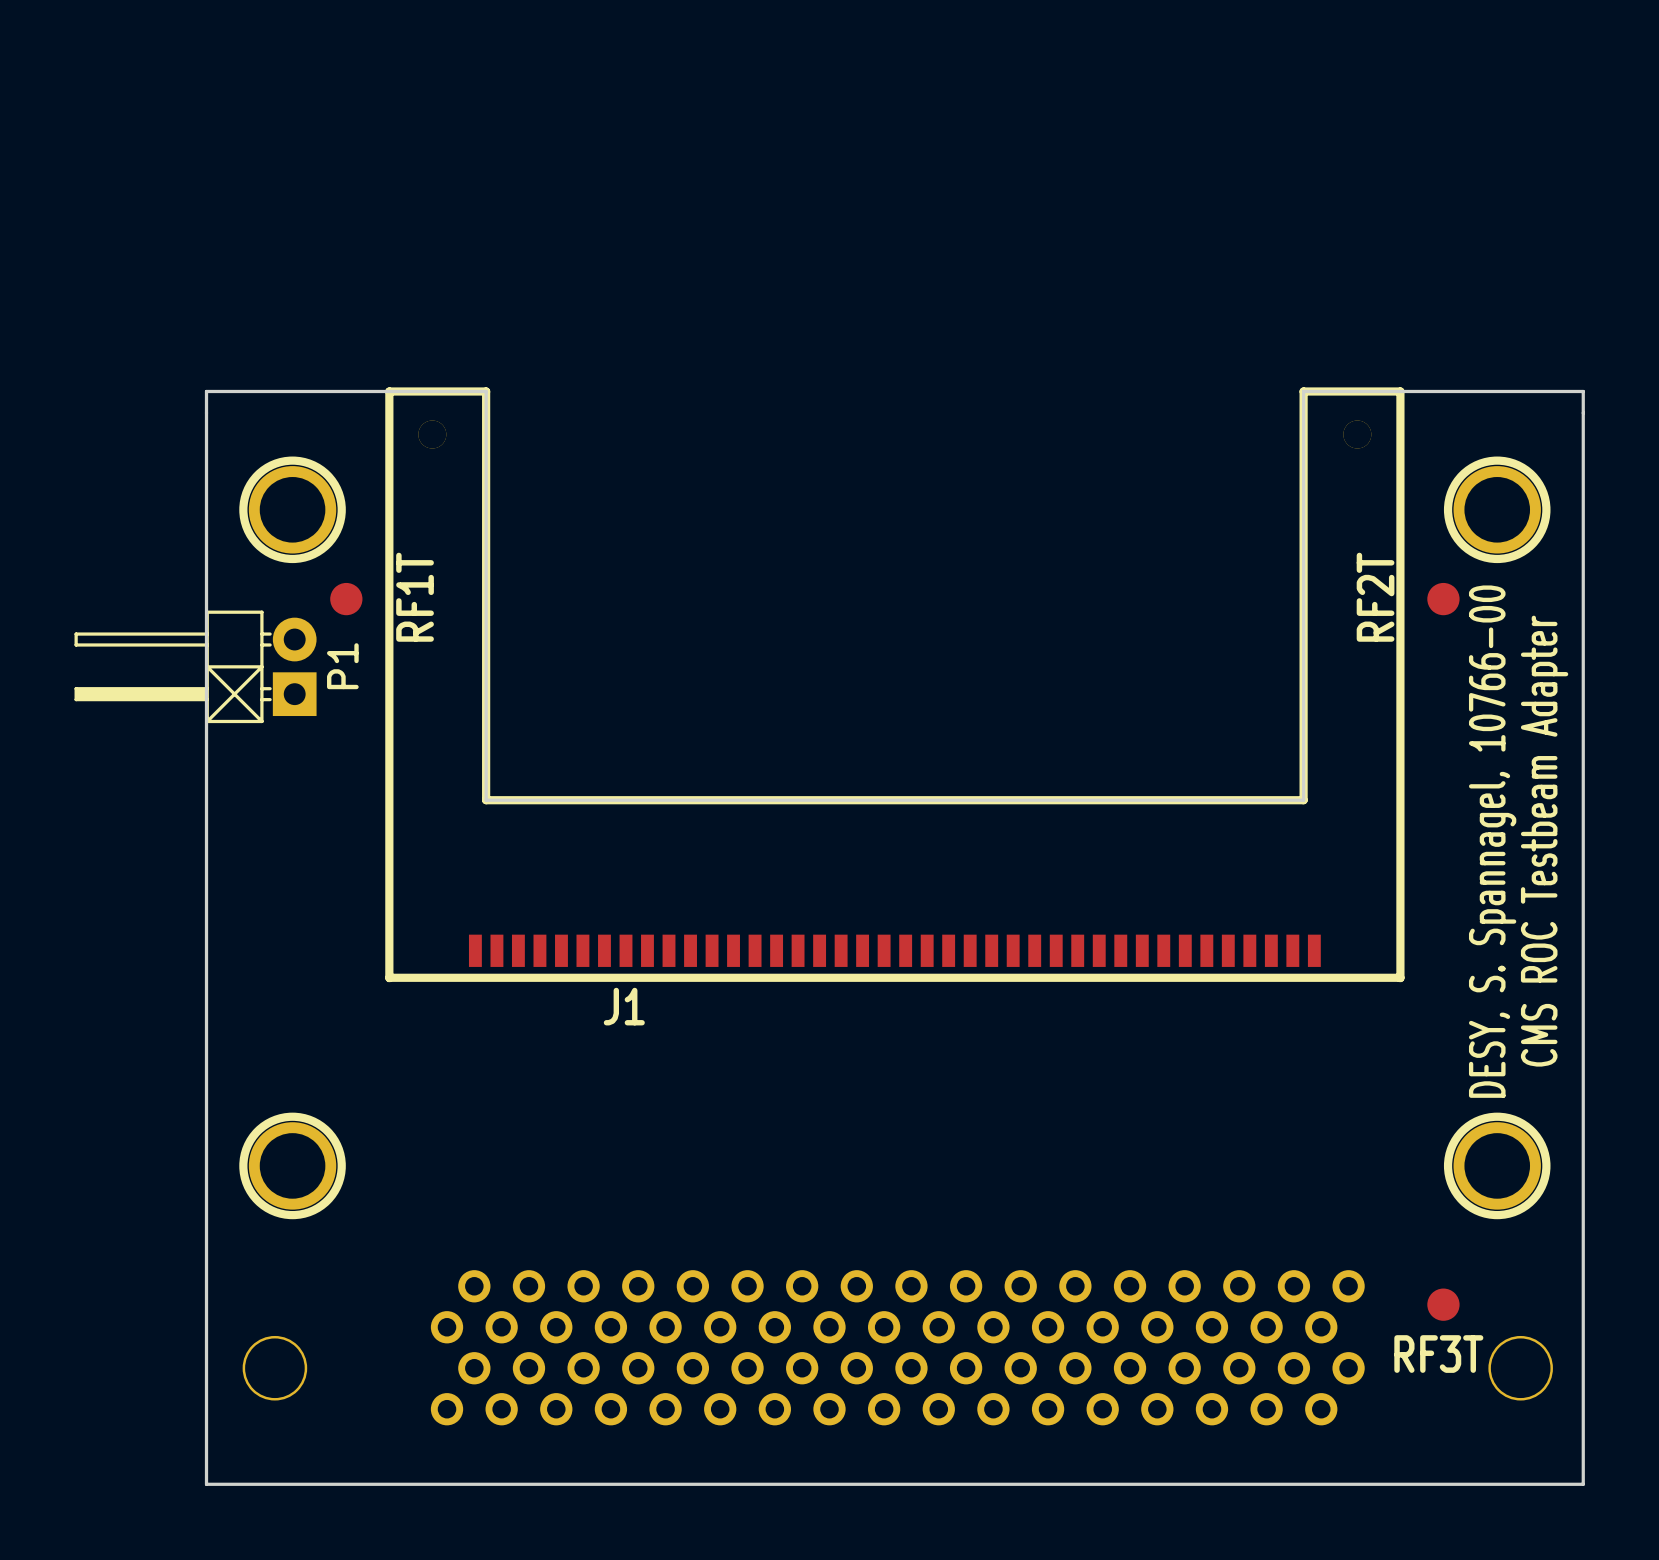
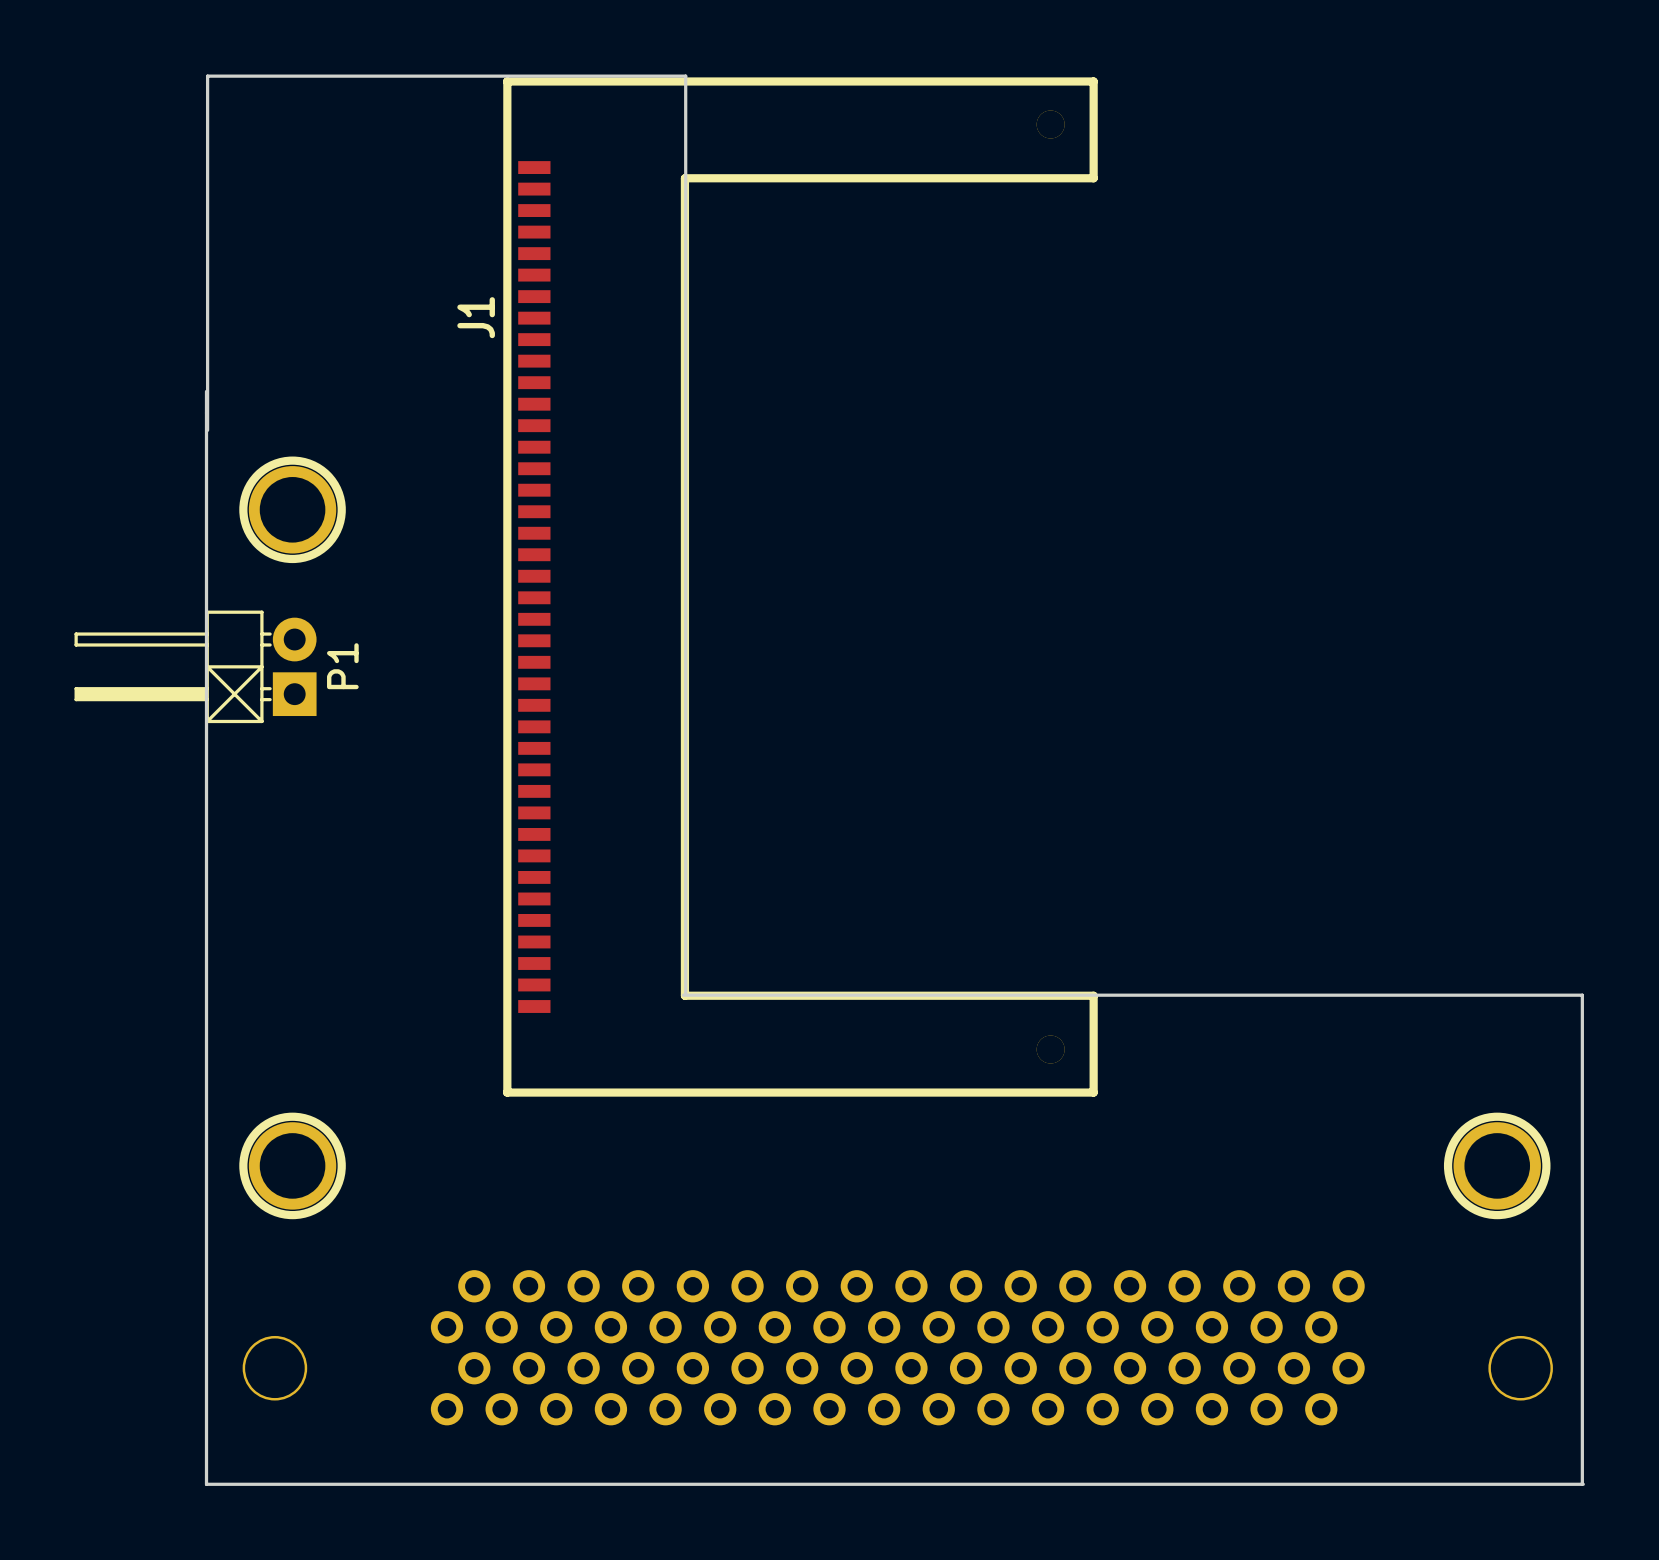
board edge: (206, 391) (486, 391) (486, 800) (1303, 800) (1303, 391) (1583, 391) (1583, 1484) -> none
board edge: none -> (207, 430) (207, 76) (685, 76) (685, 993)
part: (1497, 509) -> none
RF1T: (346, 599) -> none
RF2T: (1443, 599) -> none
J1 rotation: 0° (894, 684) -> 90° clockwise (800, 587)
text: DESY, S. Spannagel, 10766-00 (1492, 841) -> none
text: CMS ROC Testbeam Adapter (1544, 841) -> none
board edge: none -> (683, 995) (1582, 995) (1582, 1483)
RF3T: (1443, 1304) -> none

